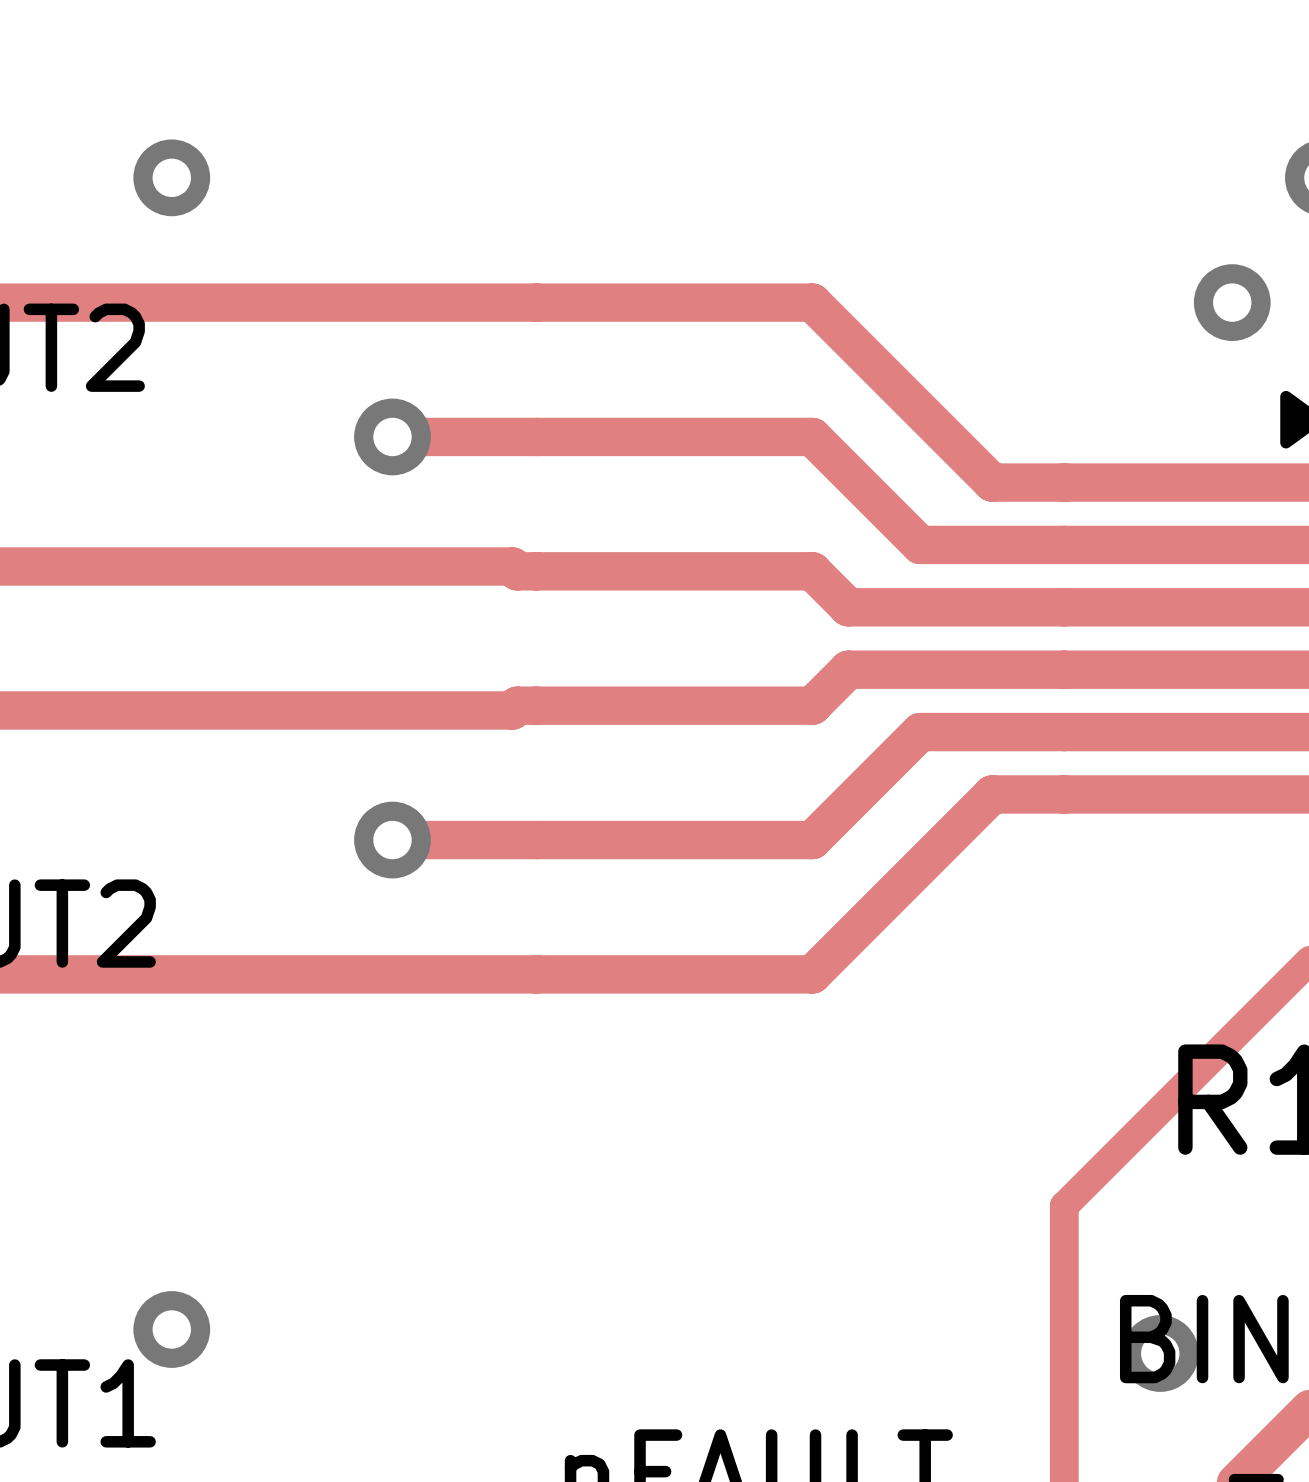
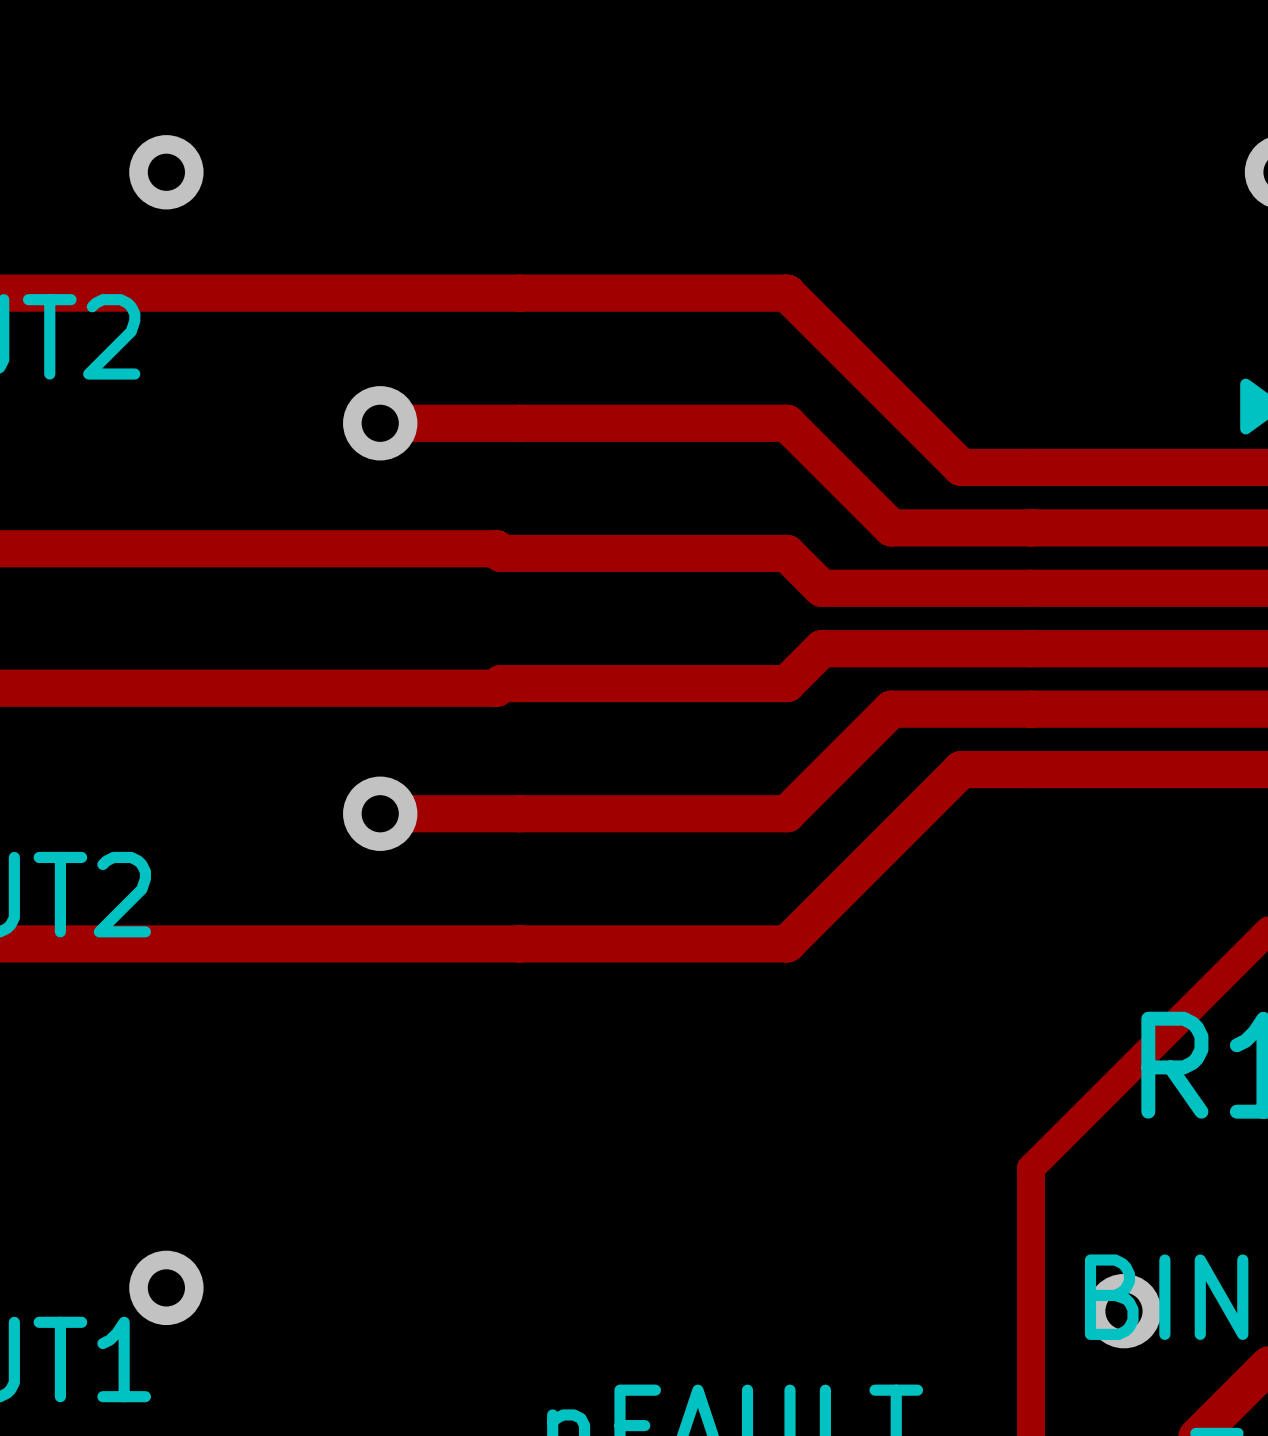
via: (1232, 302) -> none

